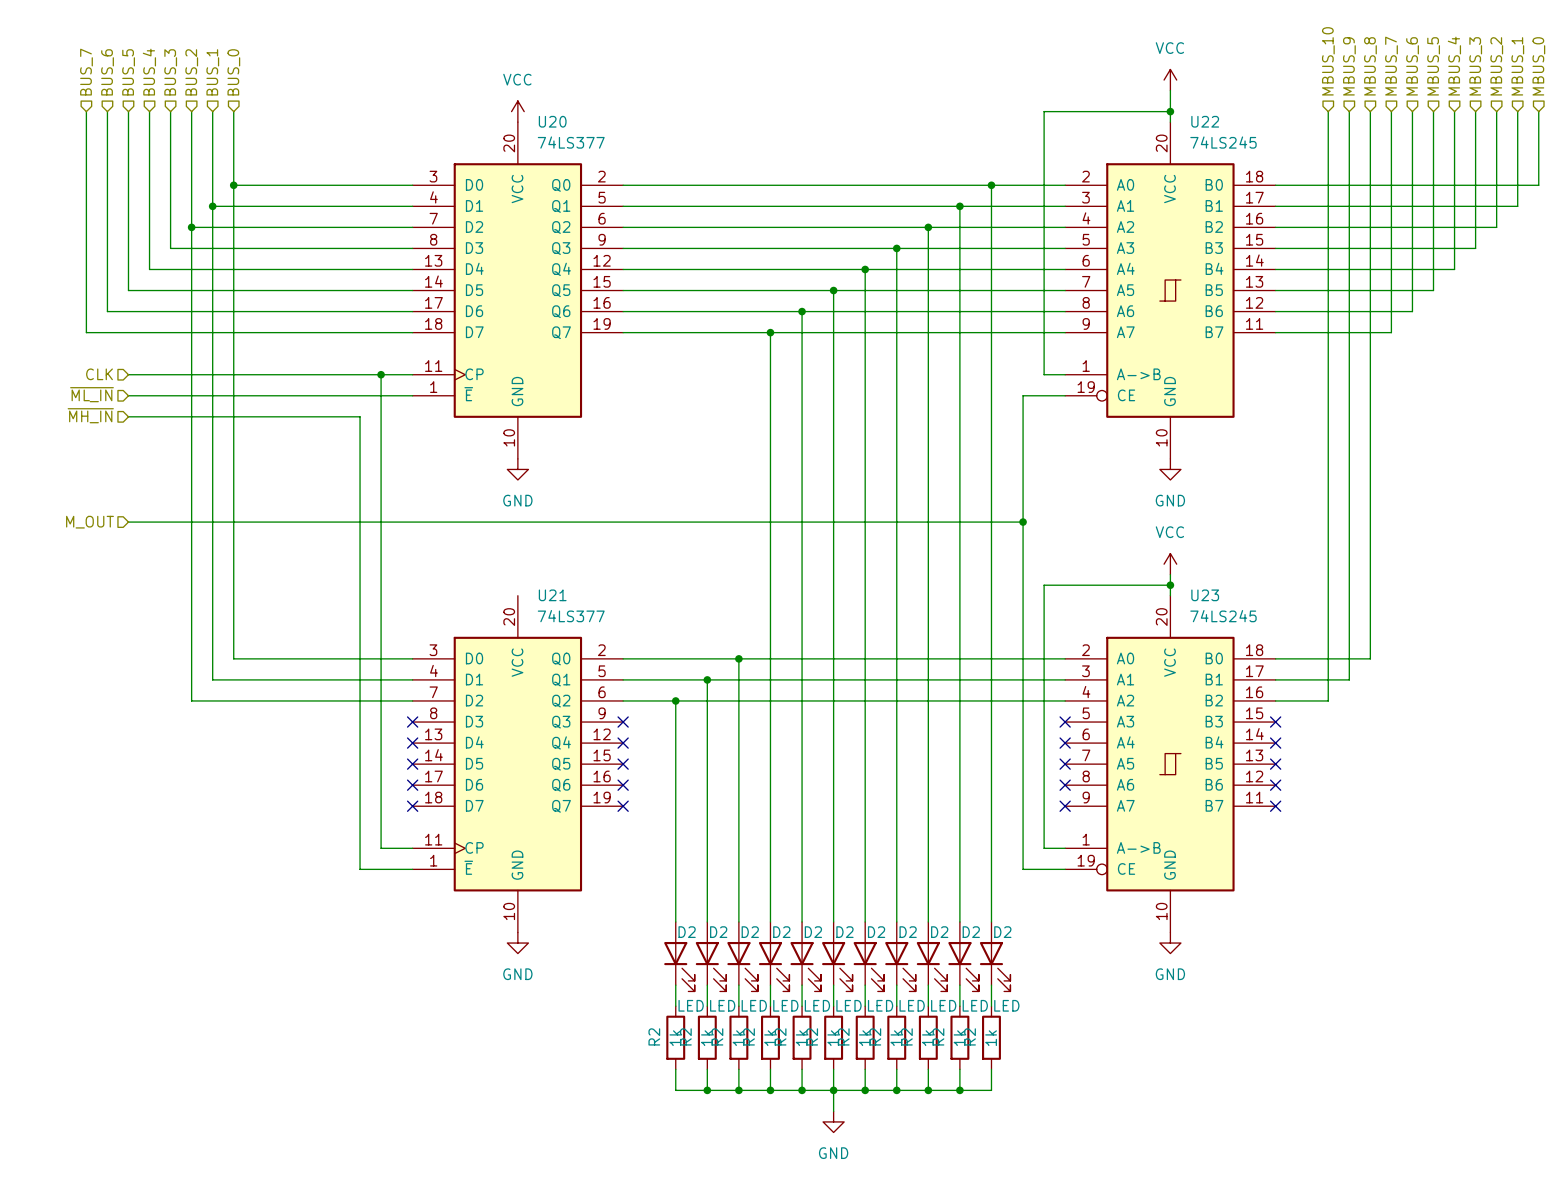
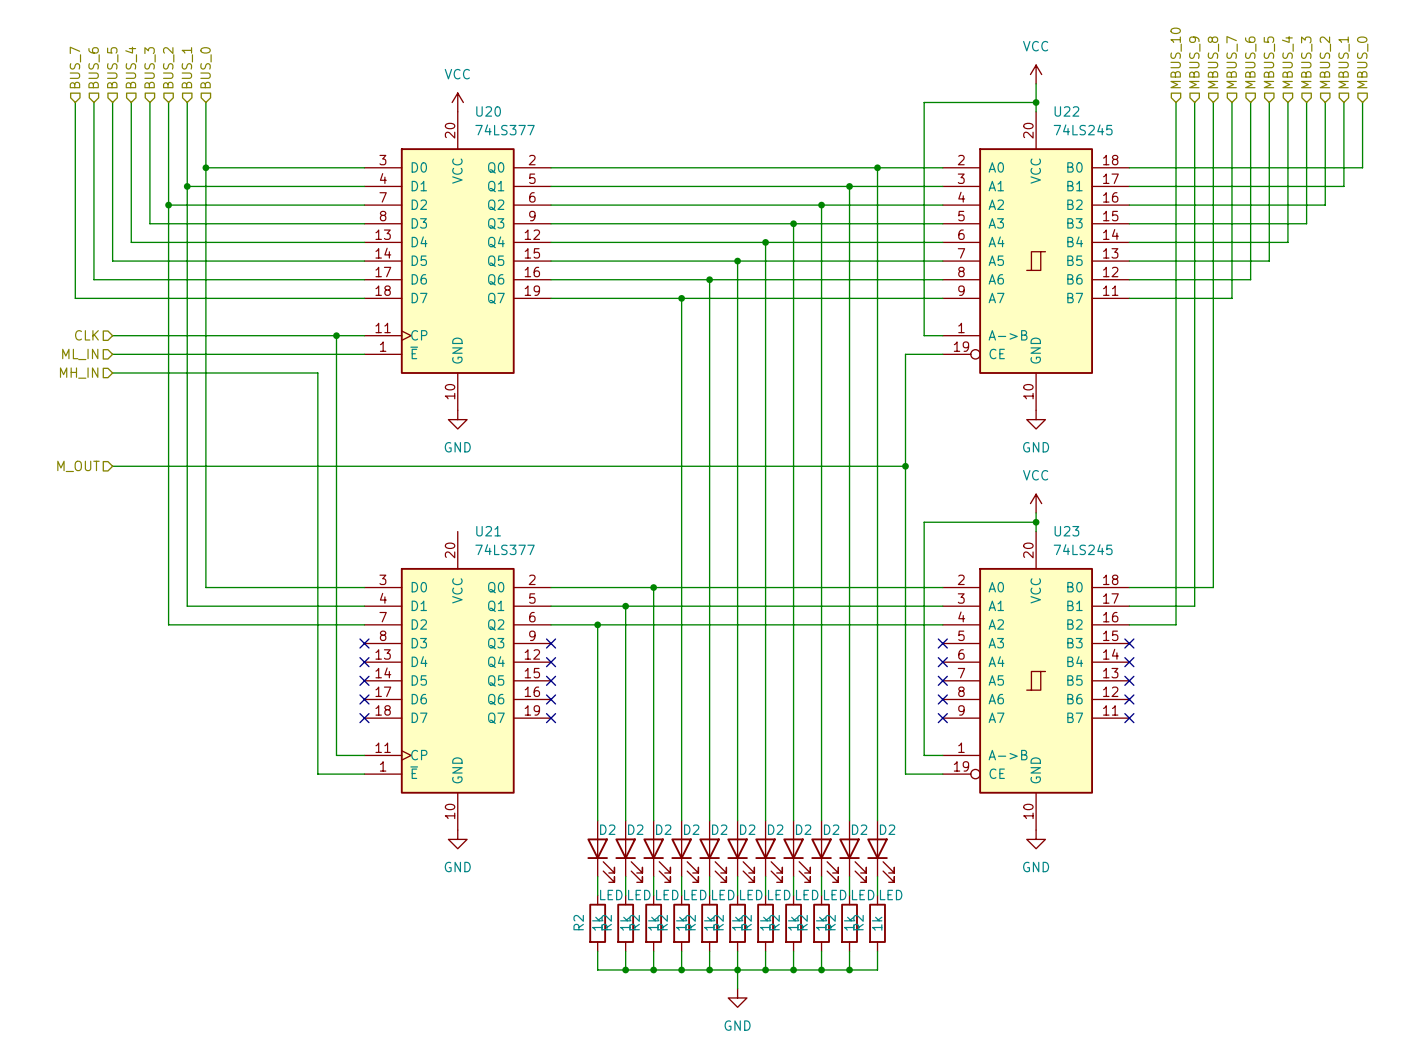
hierarchical label: ~{ML_IN} (91, 394) -> ML_IN (80, 354)
hierarchical label: ~{MH_IN} (90, 415) -> MH_IN (79, 373)

